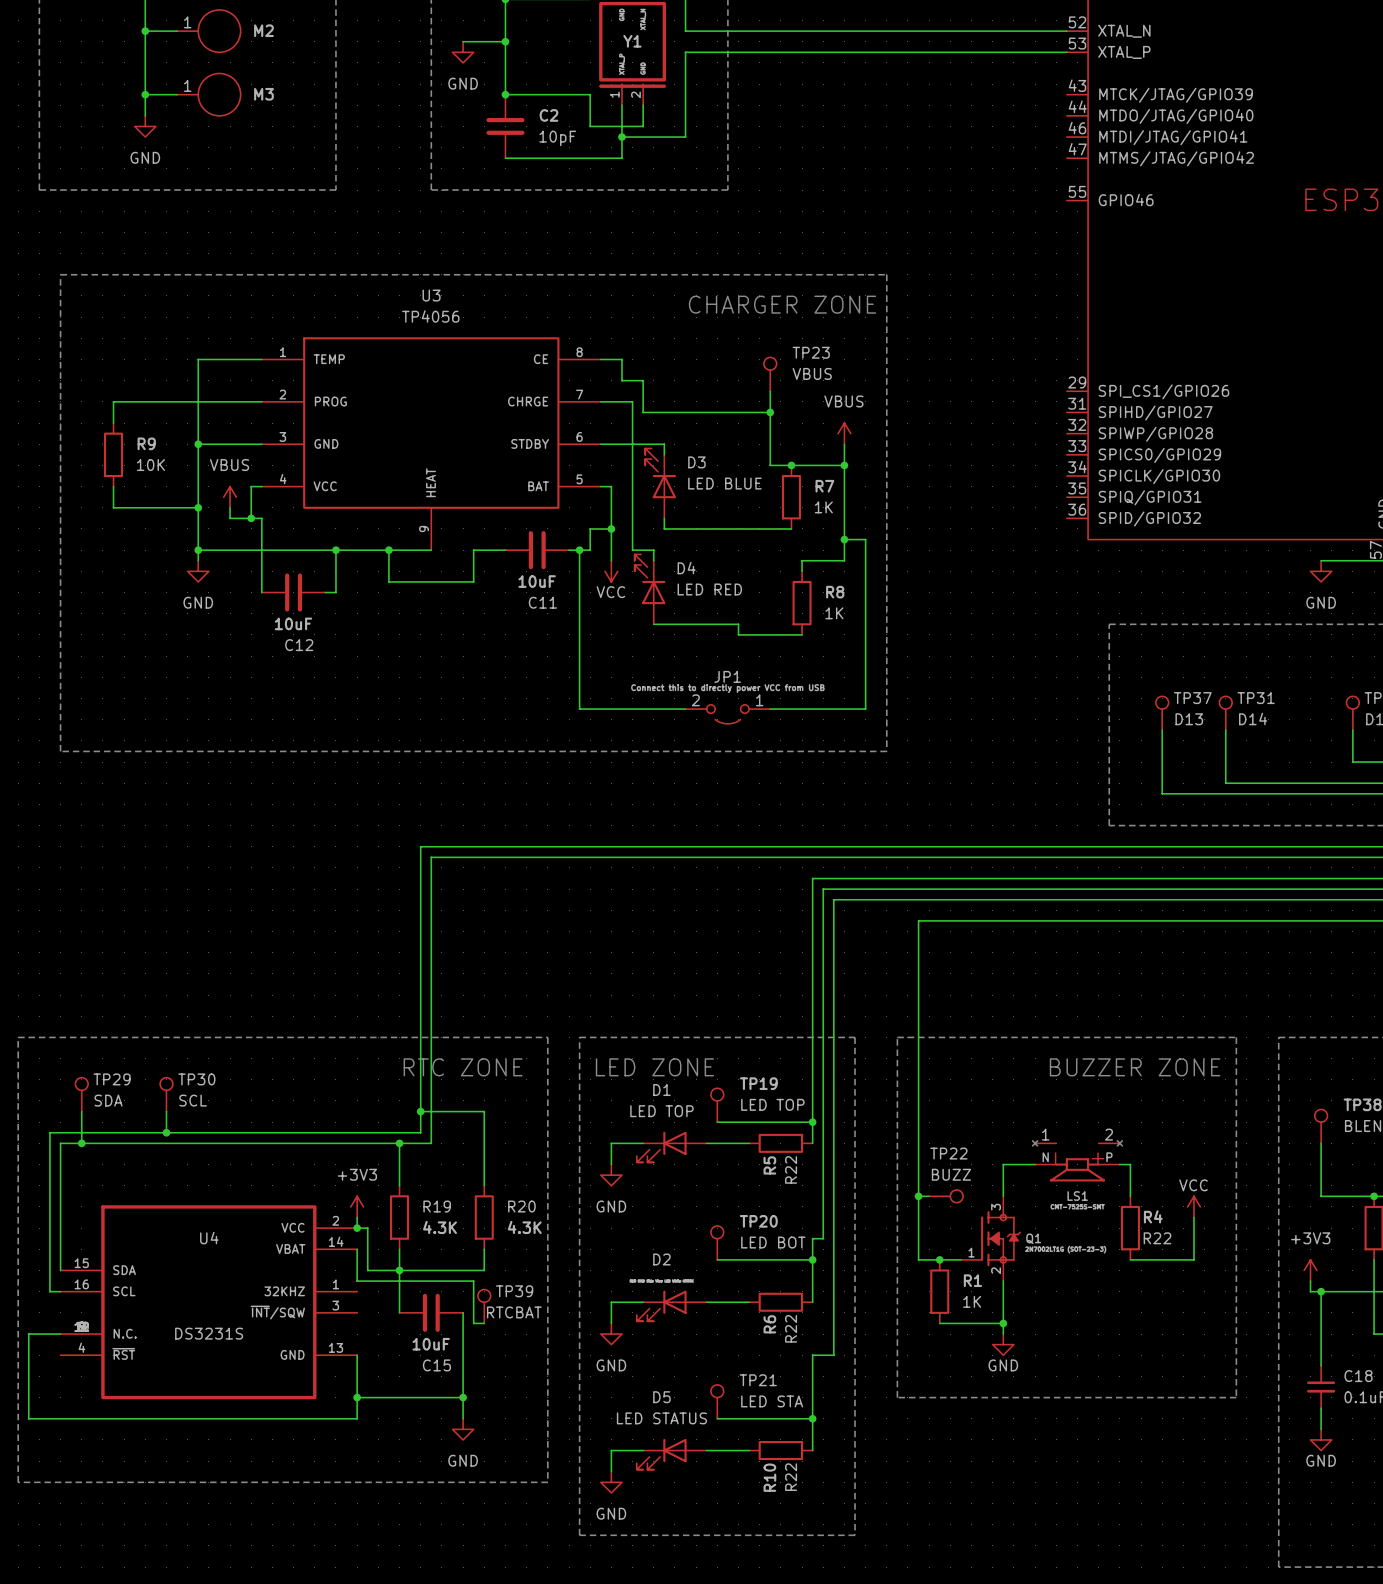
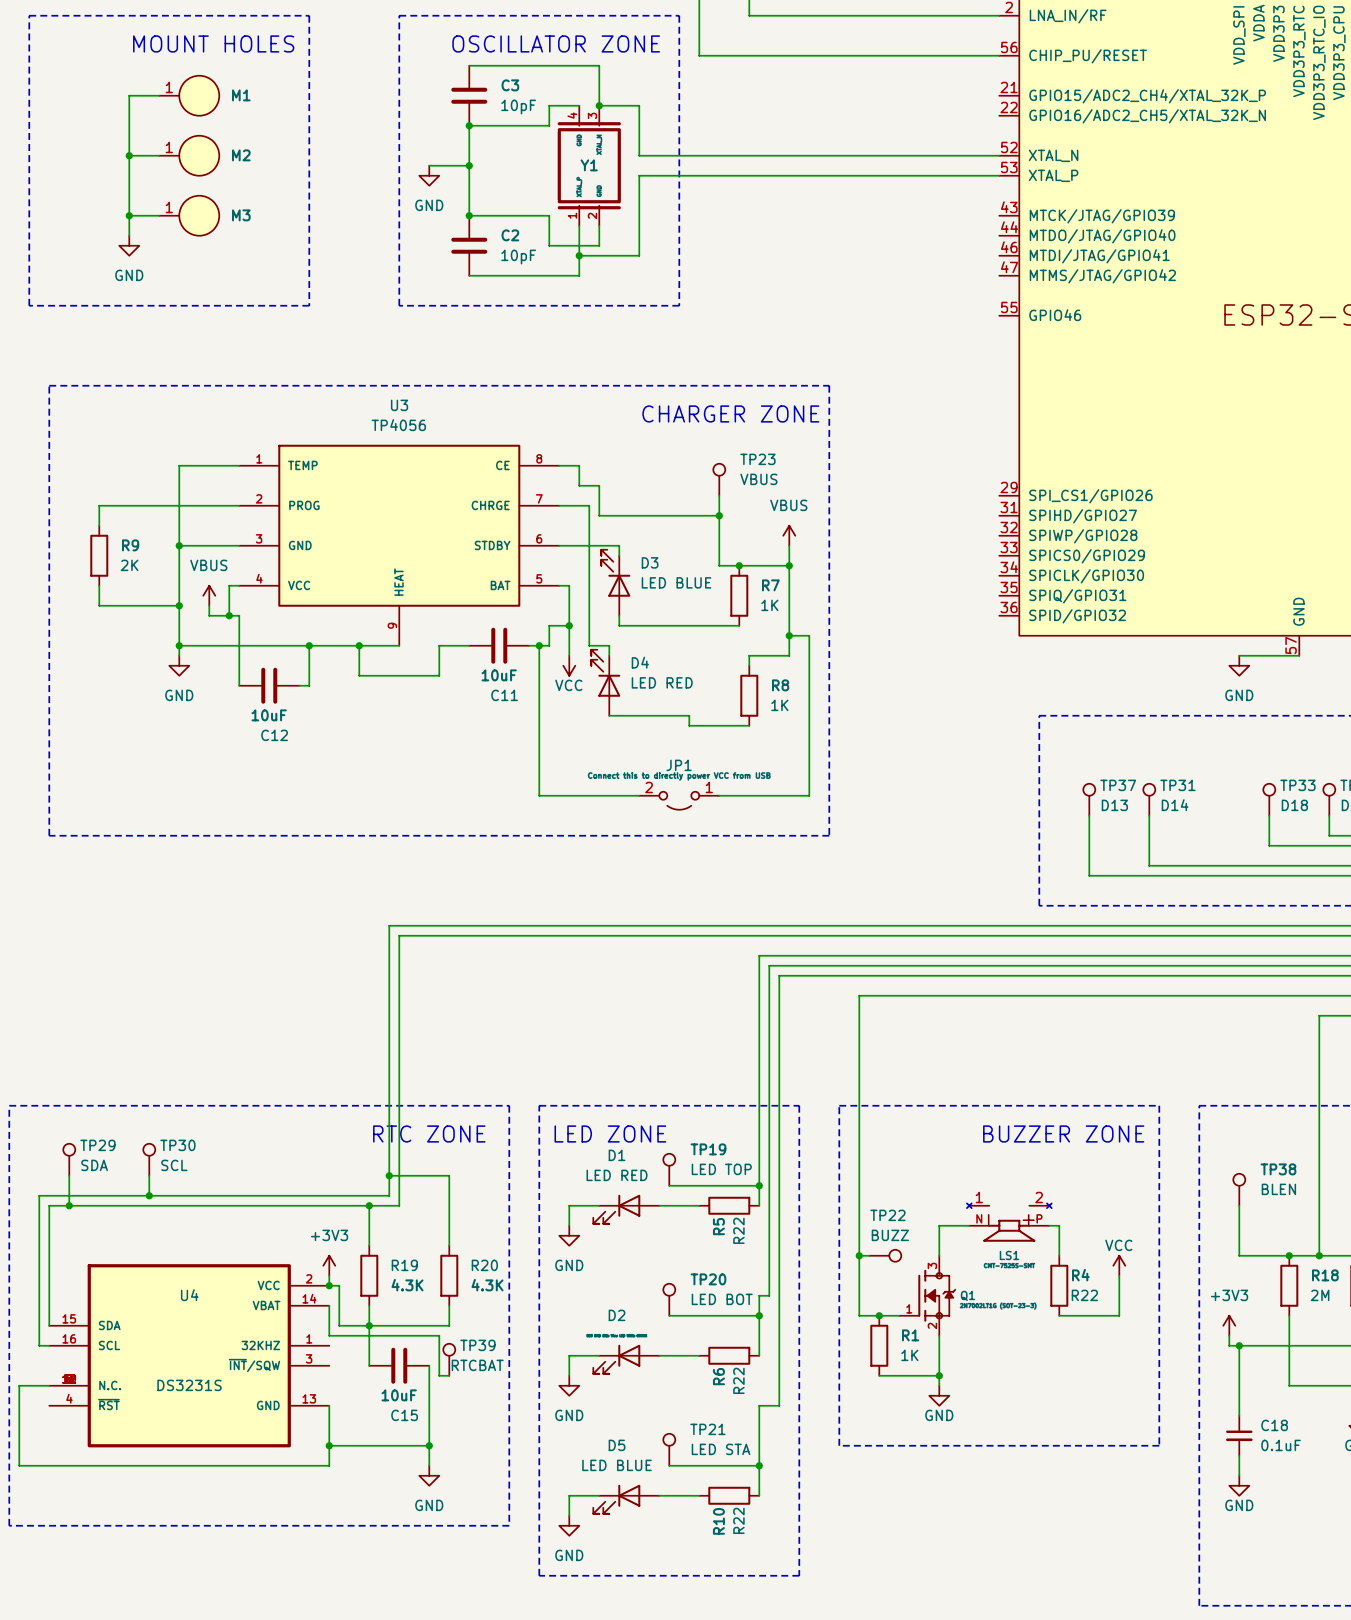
R9 value: 10K (150, 465) -> 2K (129, 565)
D1 value: LED TOP (661, 1111) -> LED RED (617, 1175)
D5 value: LED STATUS (661, 1418) -> LED BLUE (617, 1465)

